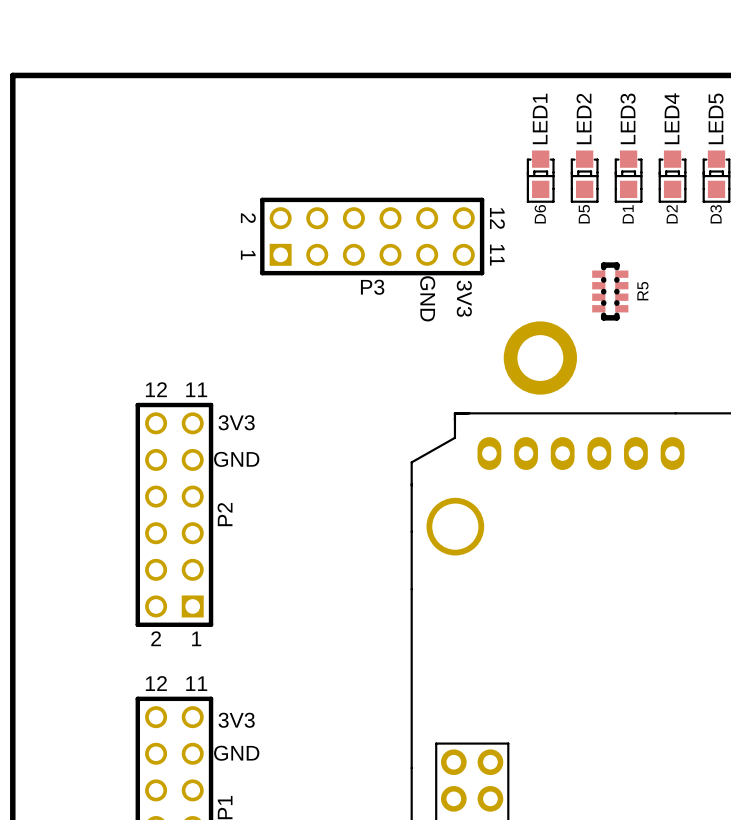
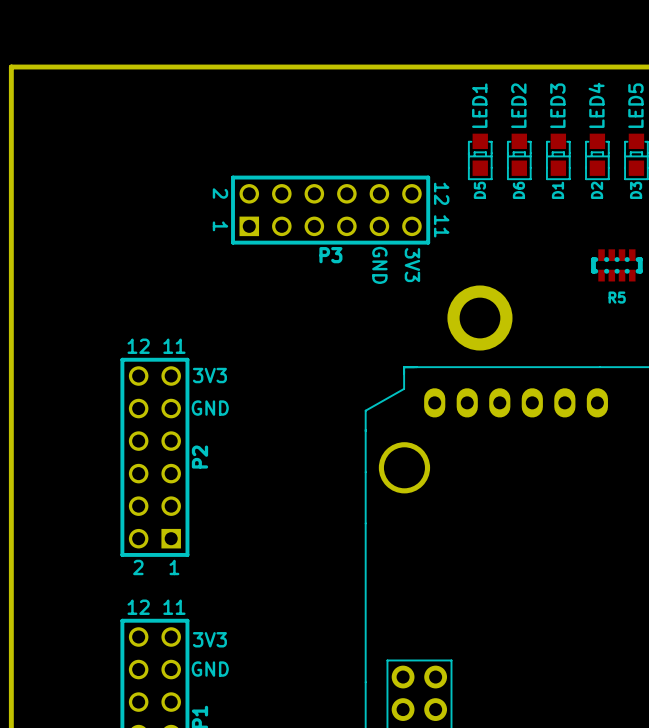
D6 name: D6 (540, 214) -> D5 (479, 190)
D5 name: D5 (584, 214) -> D6 (518, 190)
R5 rotation: 0° (610, 291) -> 90° counterclockwise (616, 265)
R5 position: (610, 291) -> (616, 265)
R5 name position: R5 (642, 291) -> R5 (617, 297)

